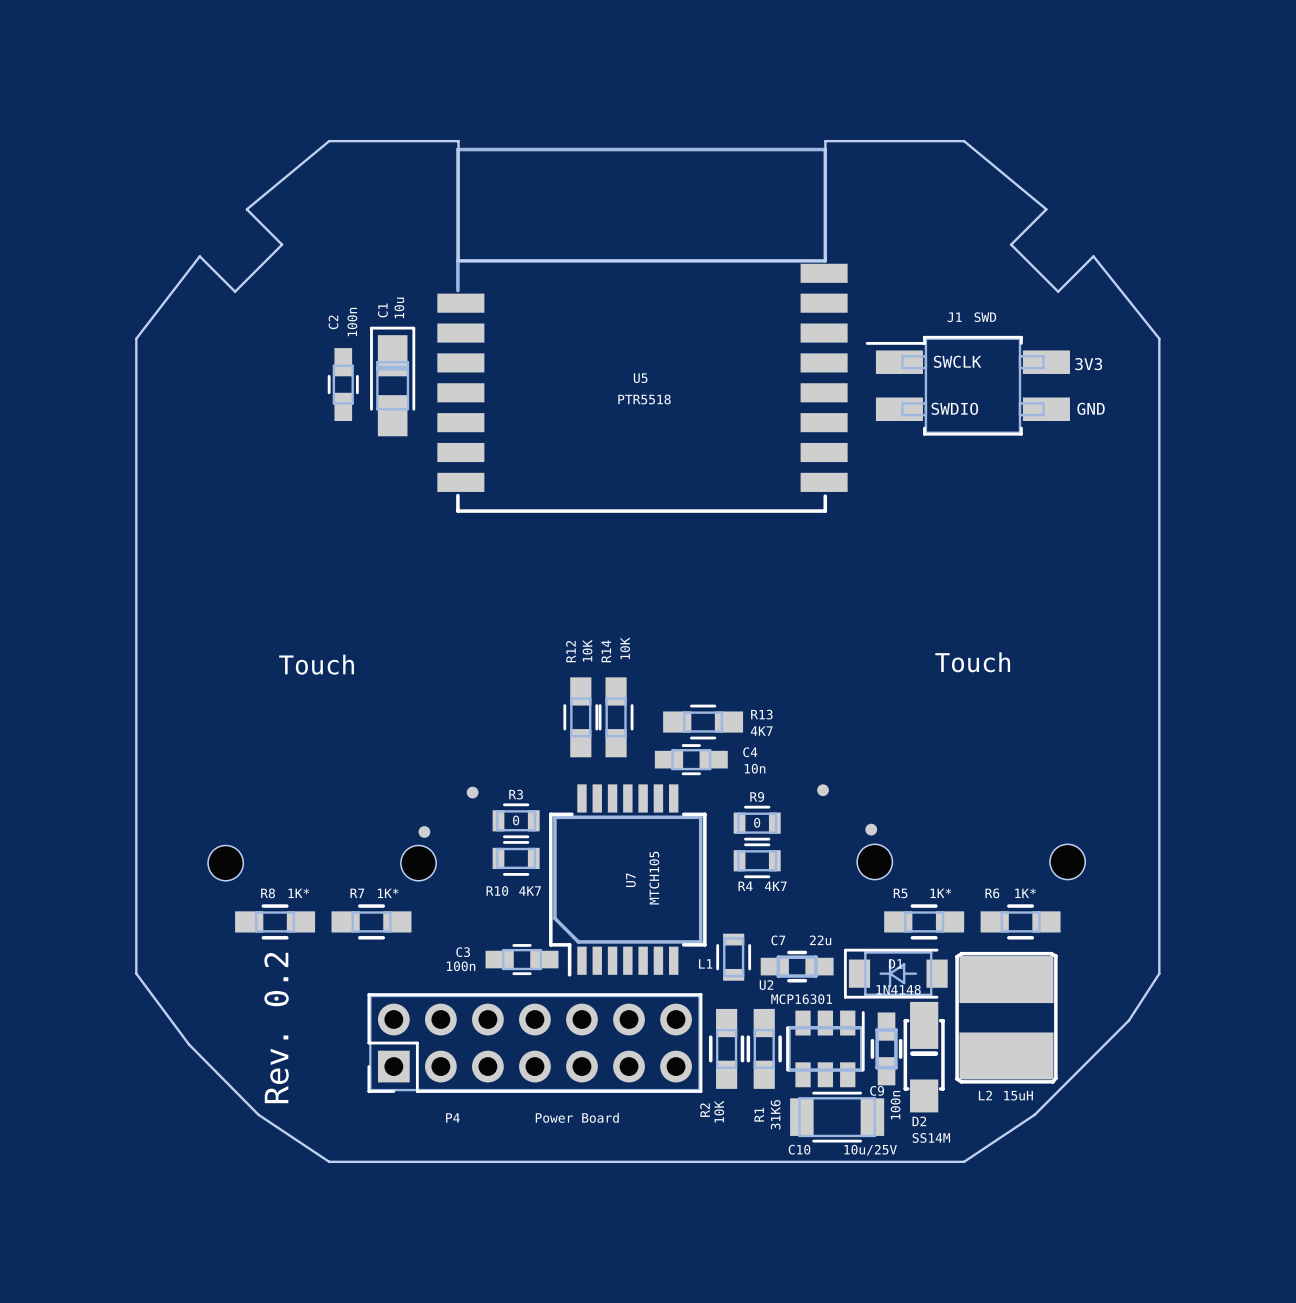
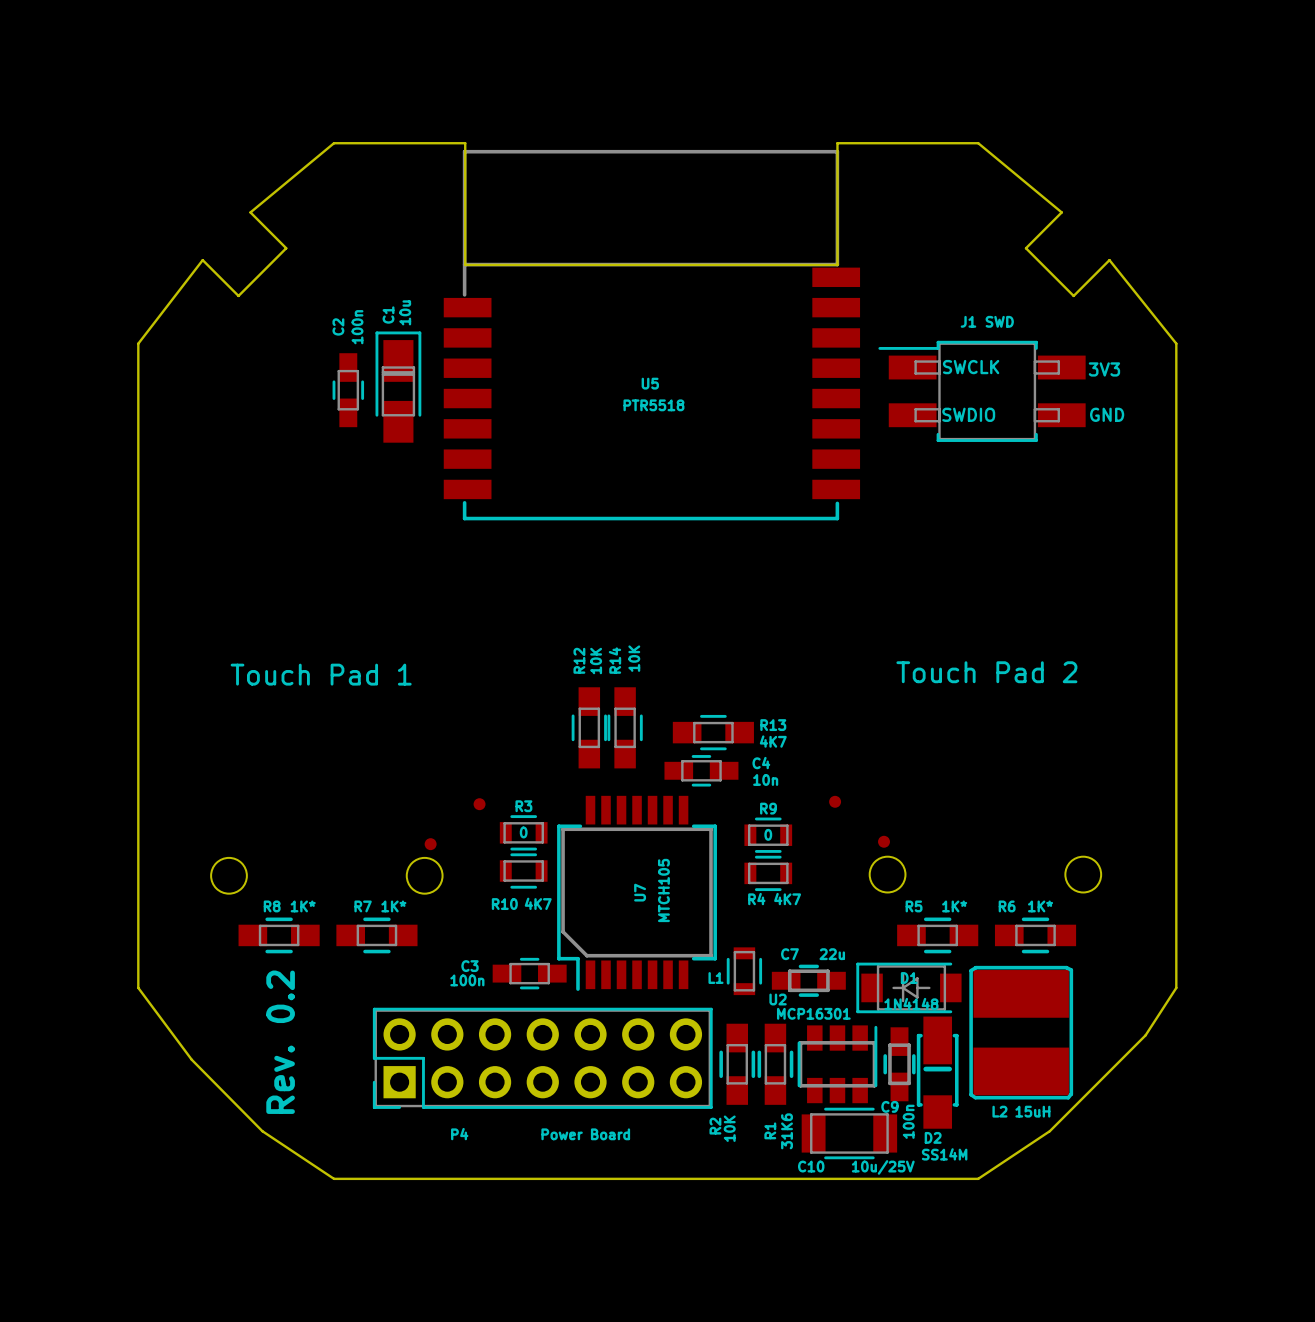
part value: Touch (972, 662) -> Touch Pad 2 (986, 672)
part value: Touch (316, 664) -> Touch Pad 1 (321, 674)

